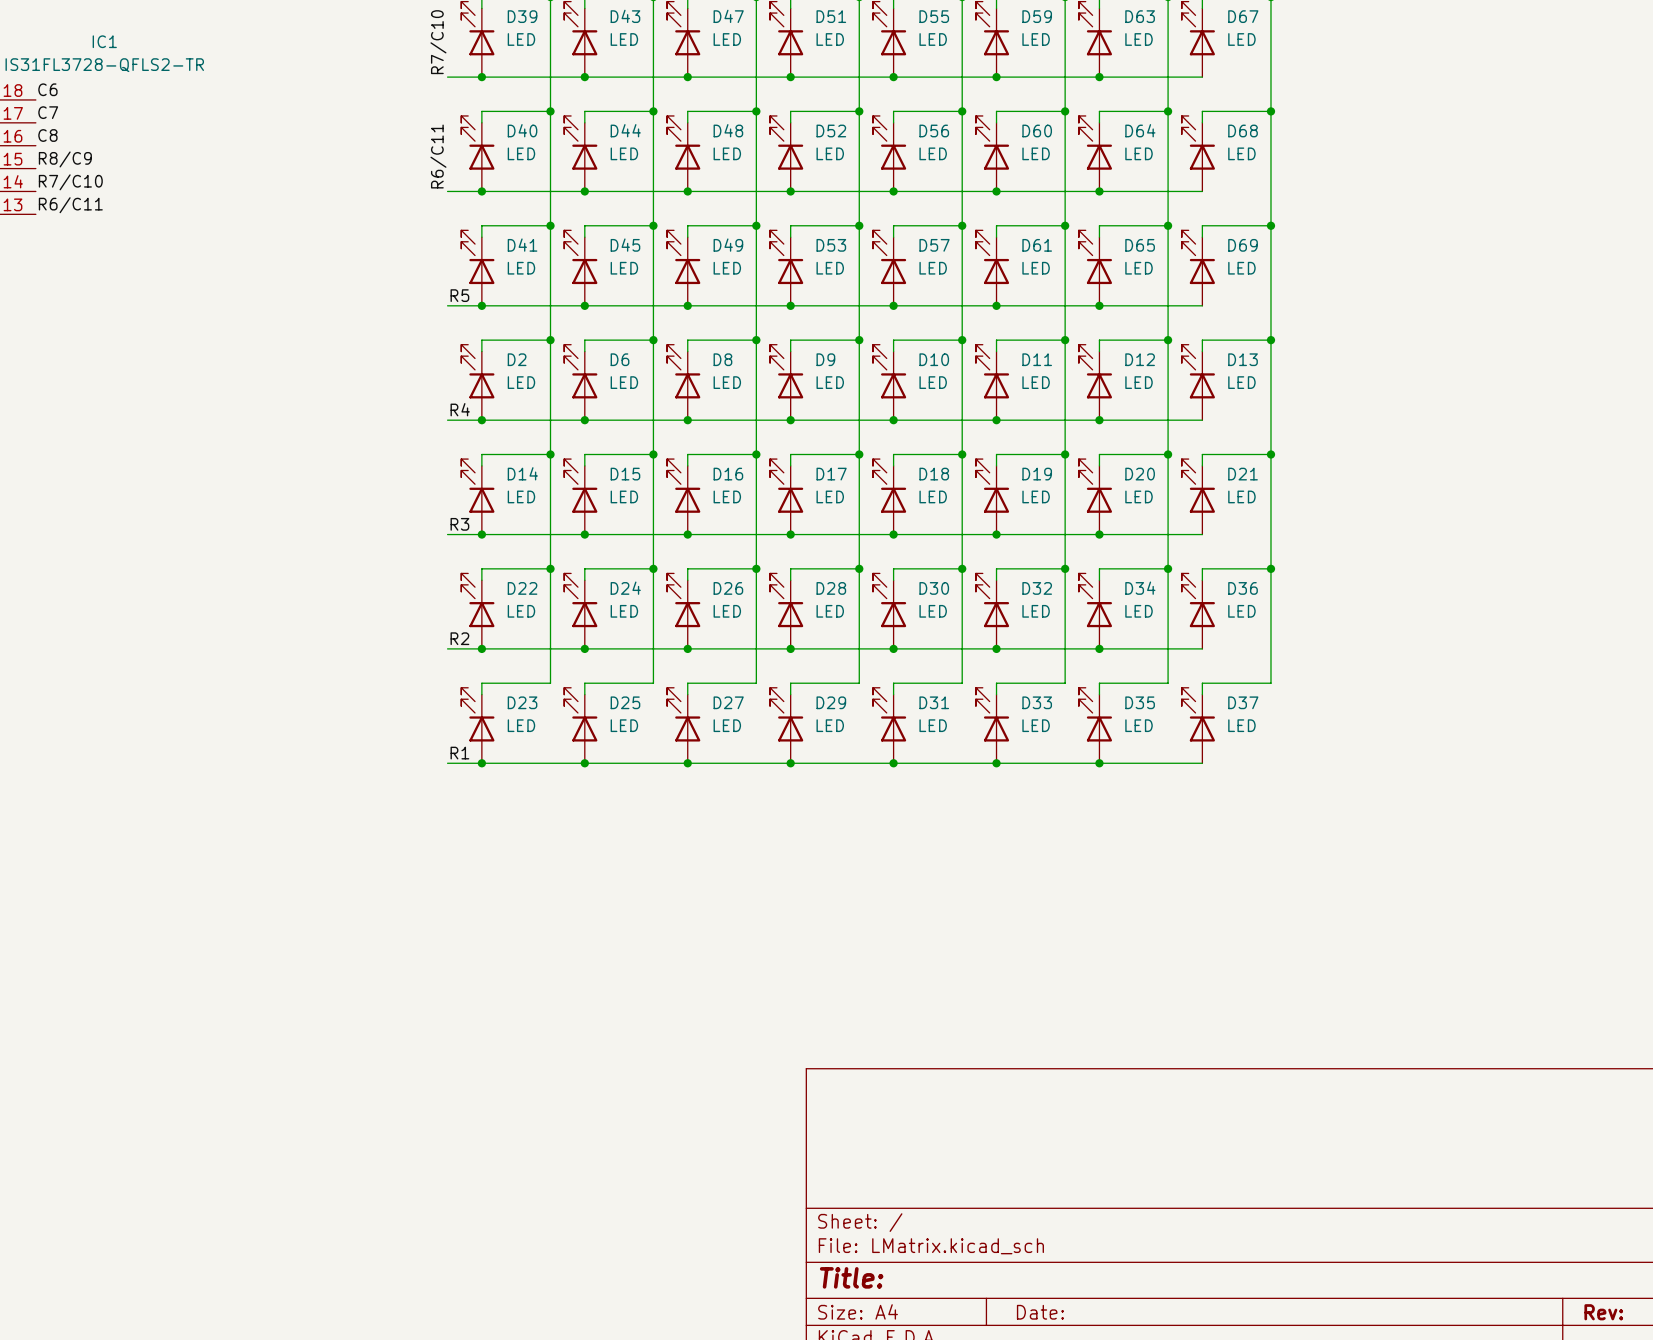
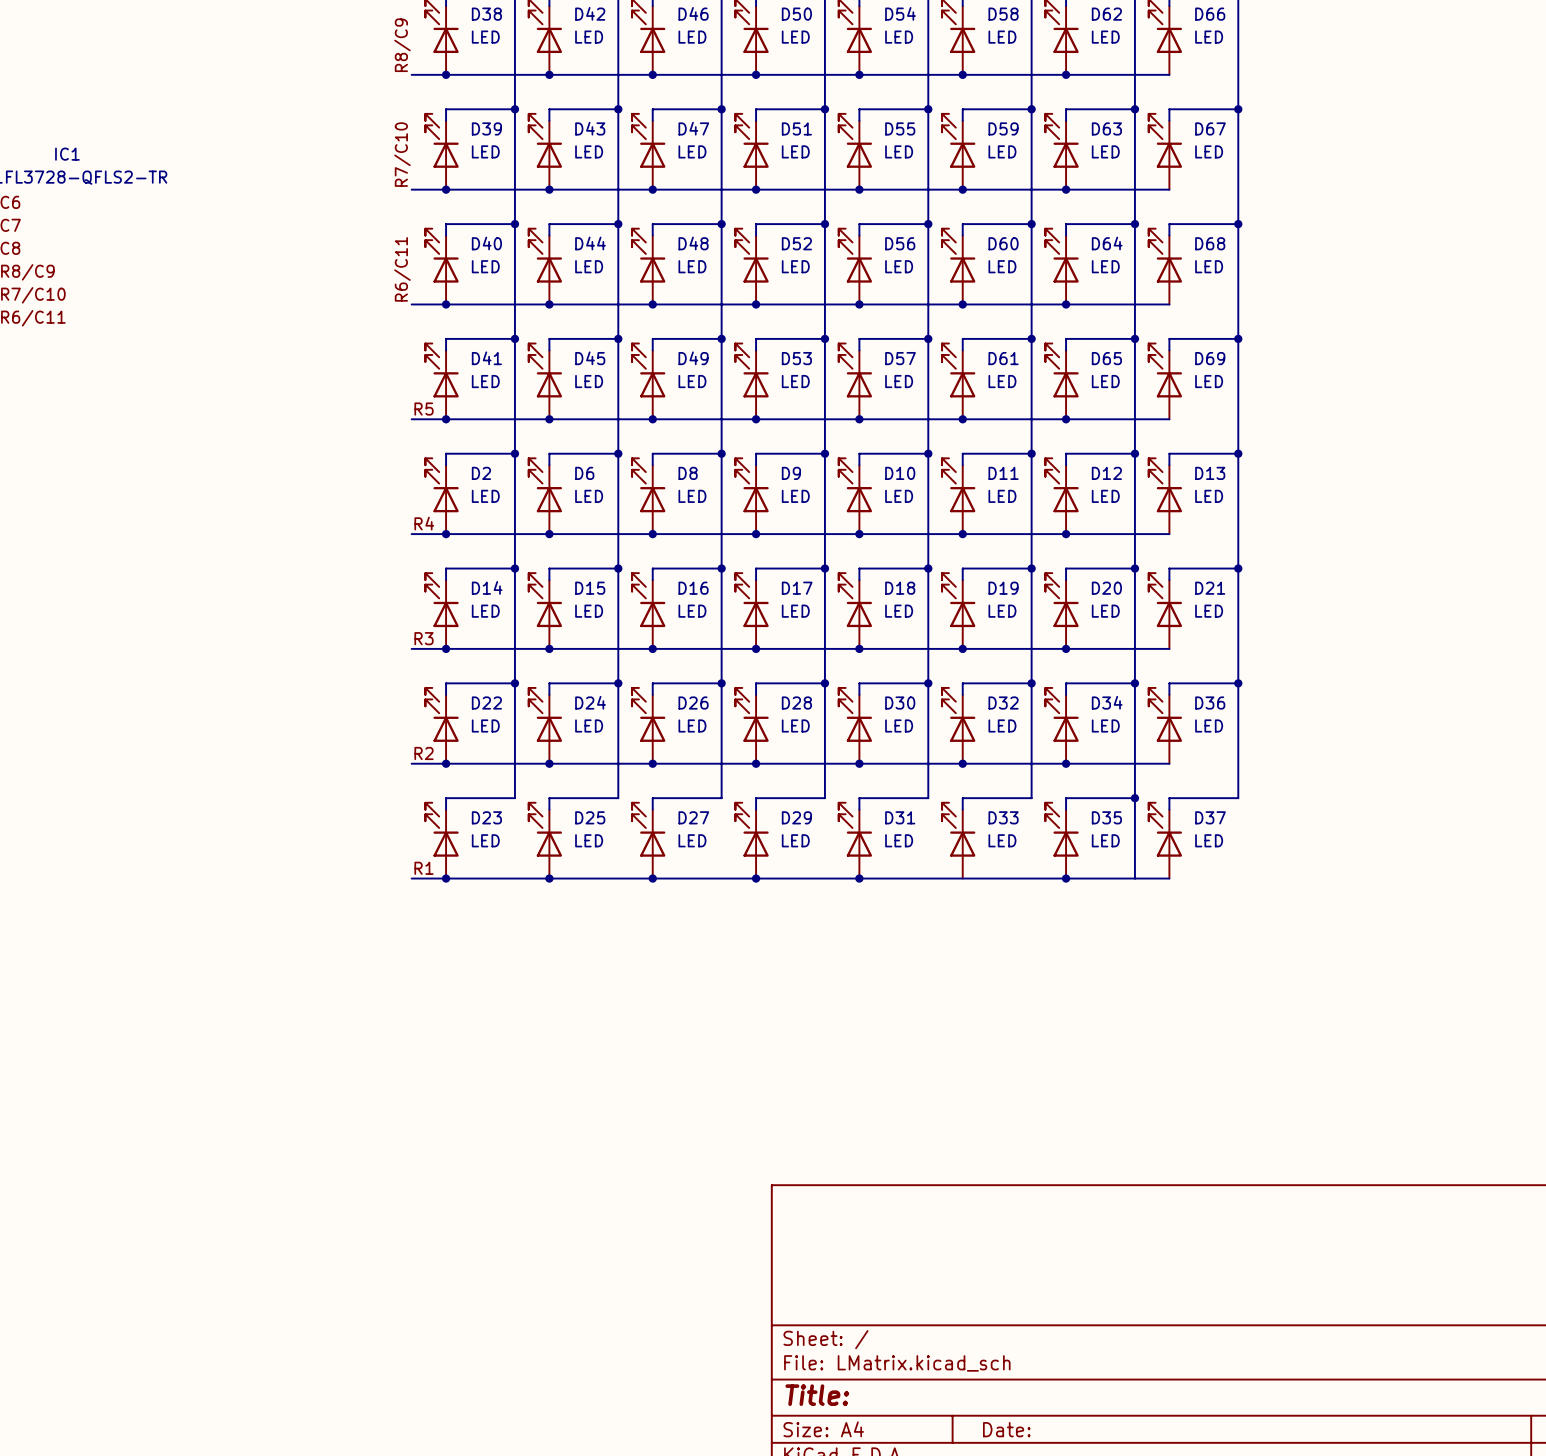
wire: none -> (1134, 798) (1134, 878)
junction: none -> (1134, 798)
junction: (996, 763) -> none

